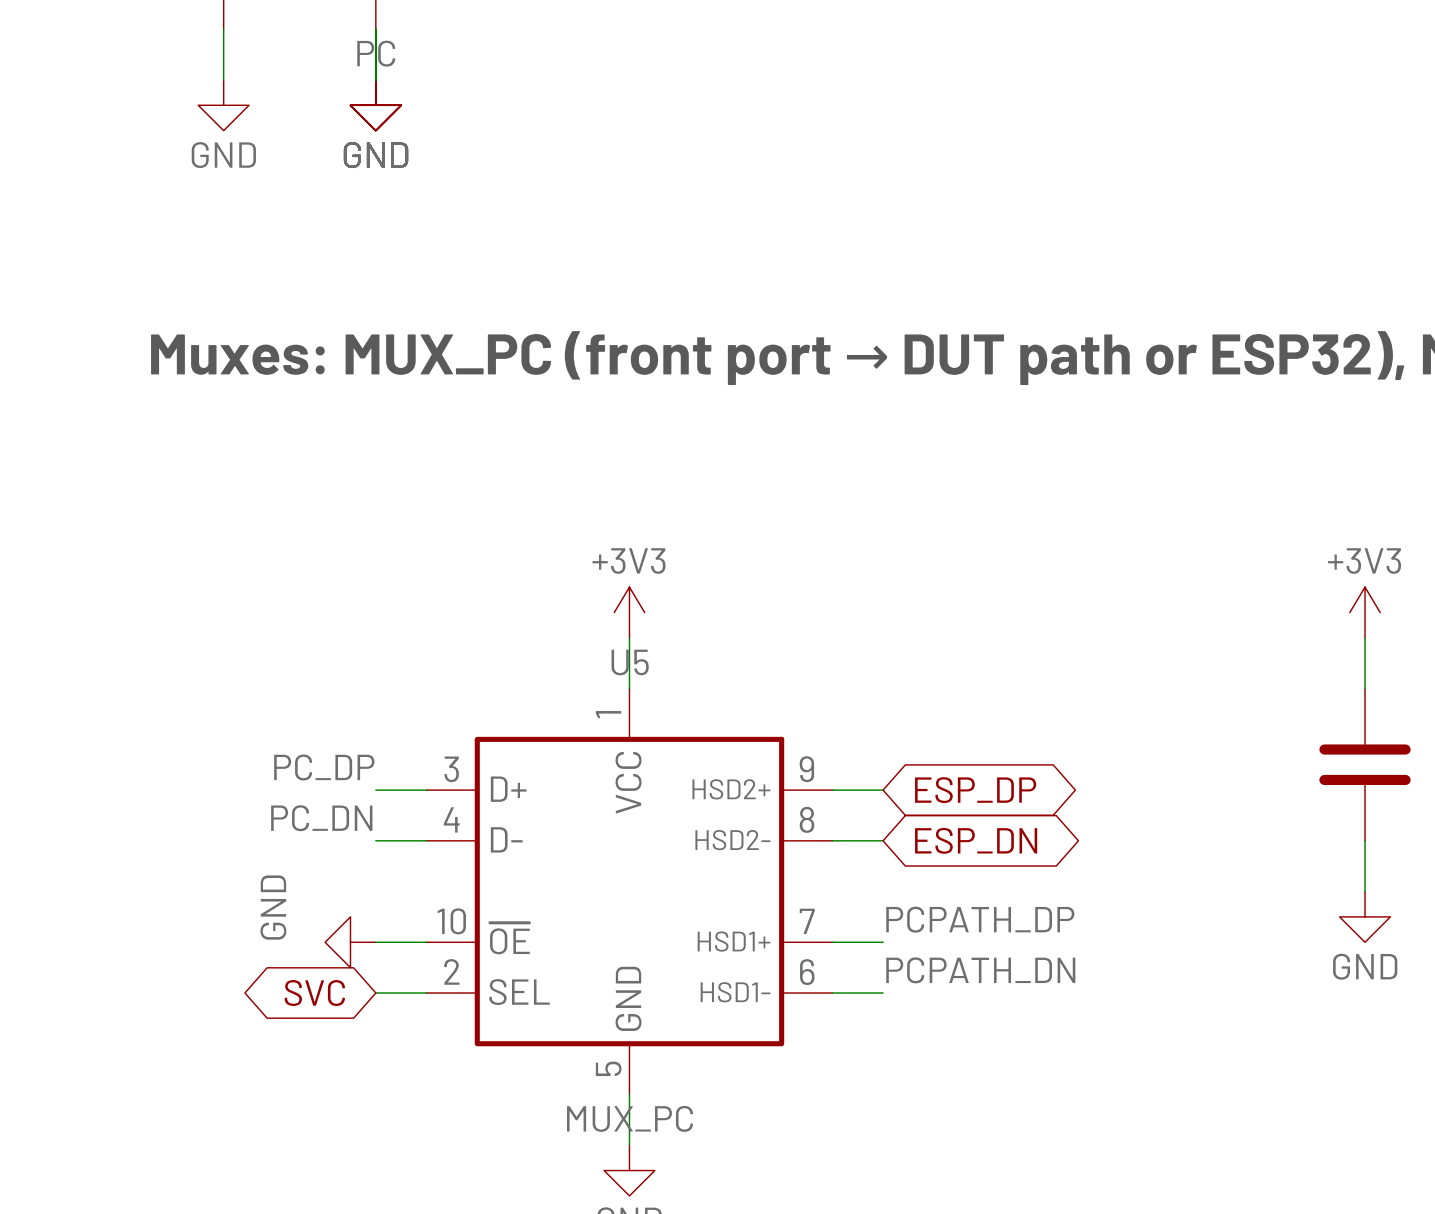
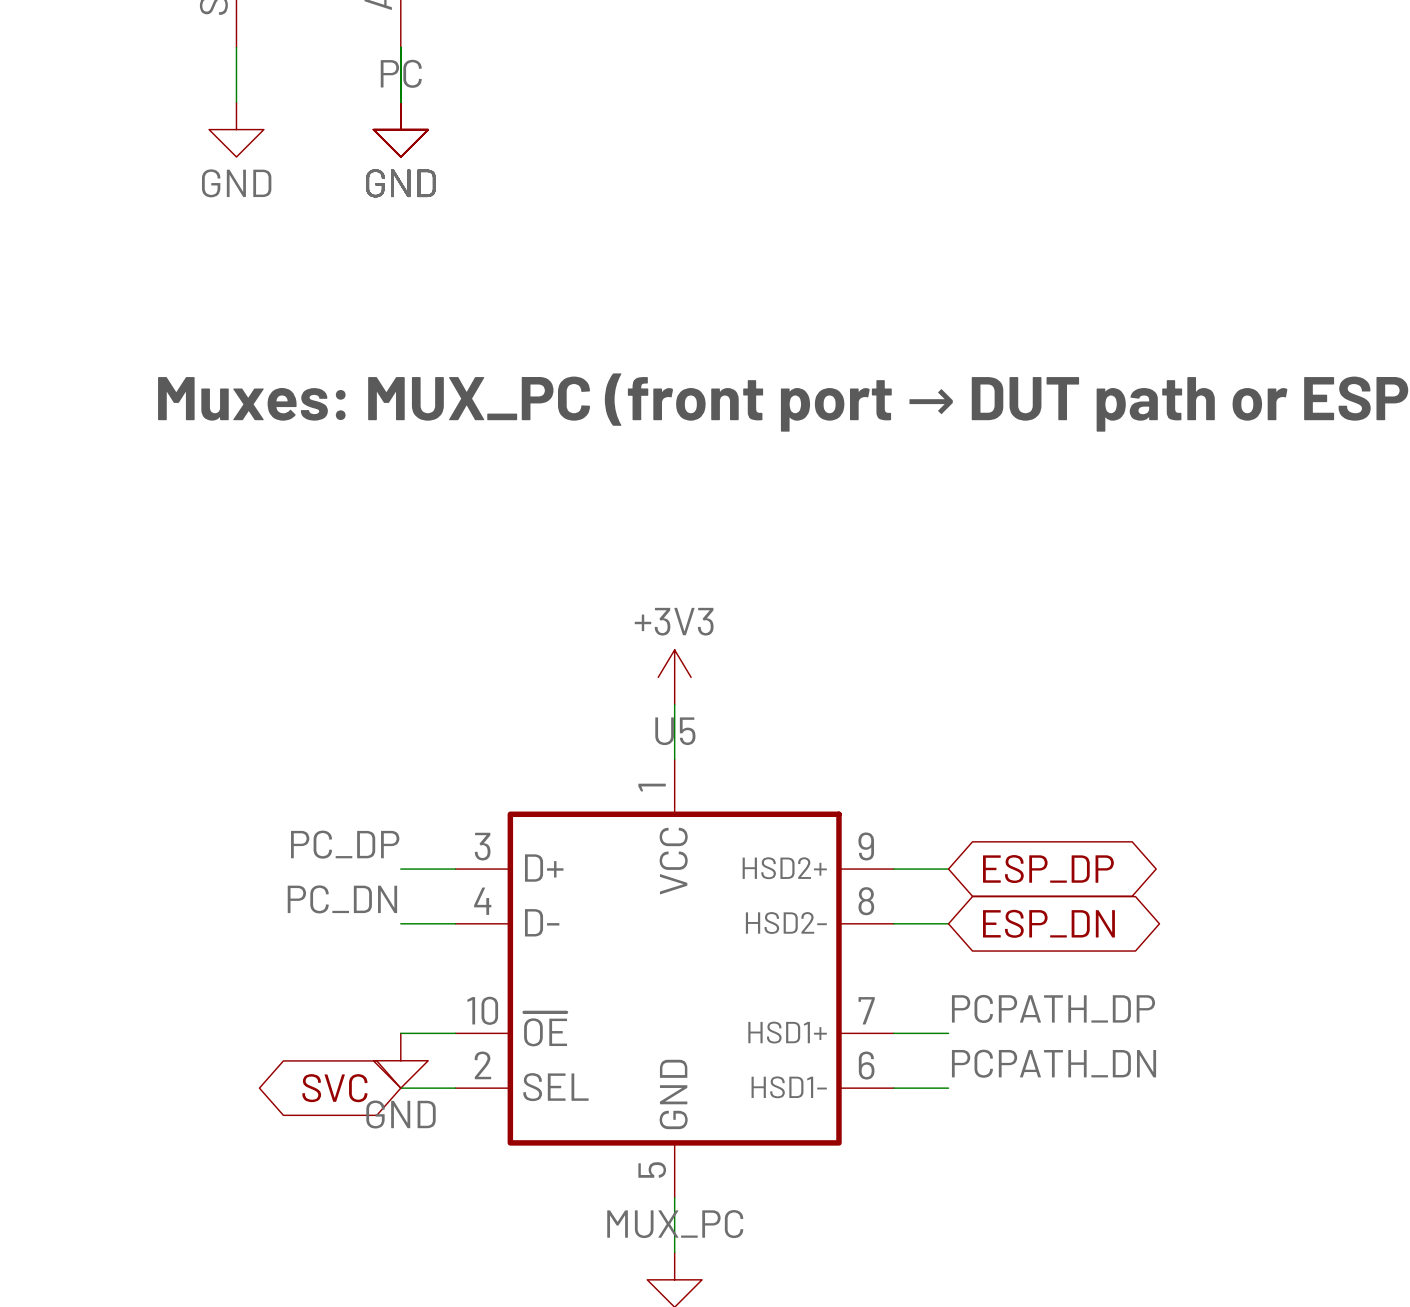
power symbol text position: GND (273, 907) -> GND (400, 1114)
power symbol rotation: 0° (350, 942) -> 90° counterclockwise (400, 1060)
power symbol position: GND (350, 942) -> GND (400, 1060)

